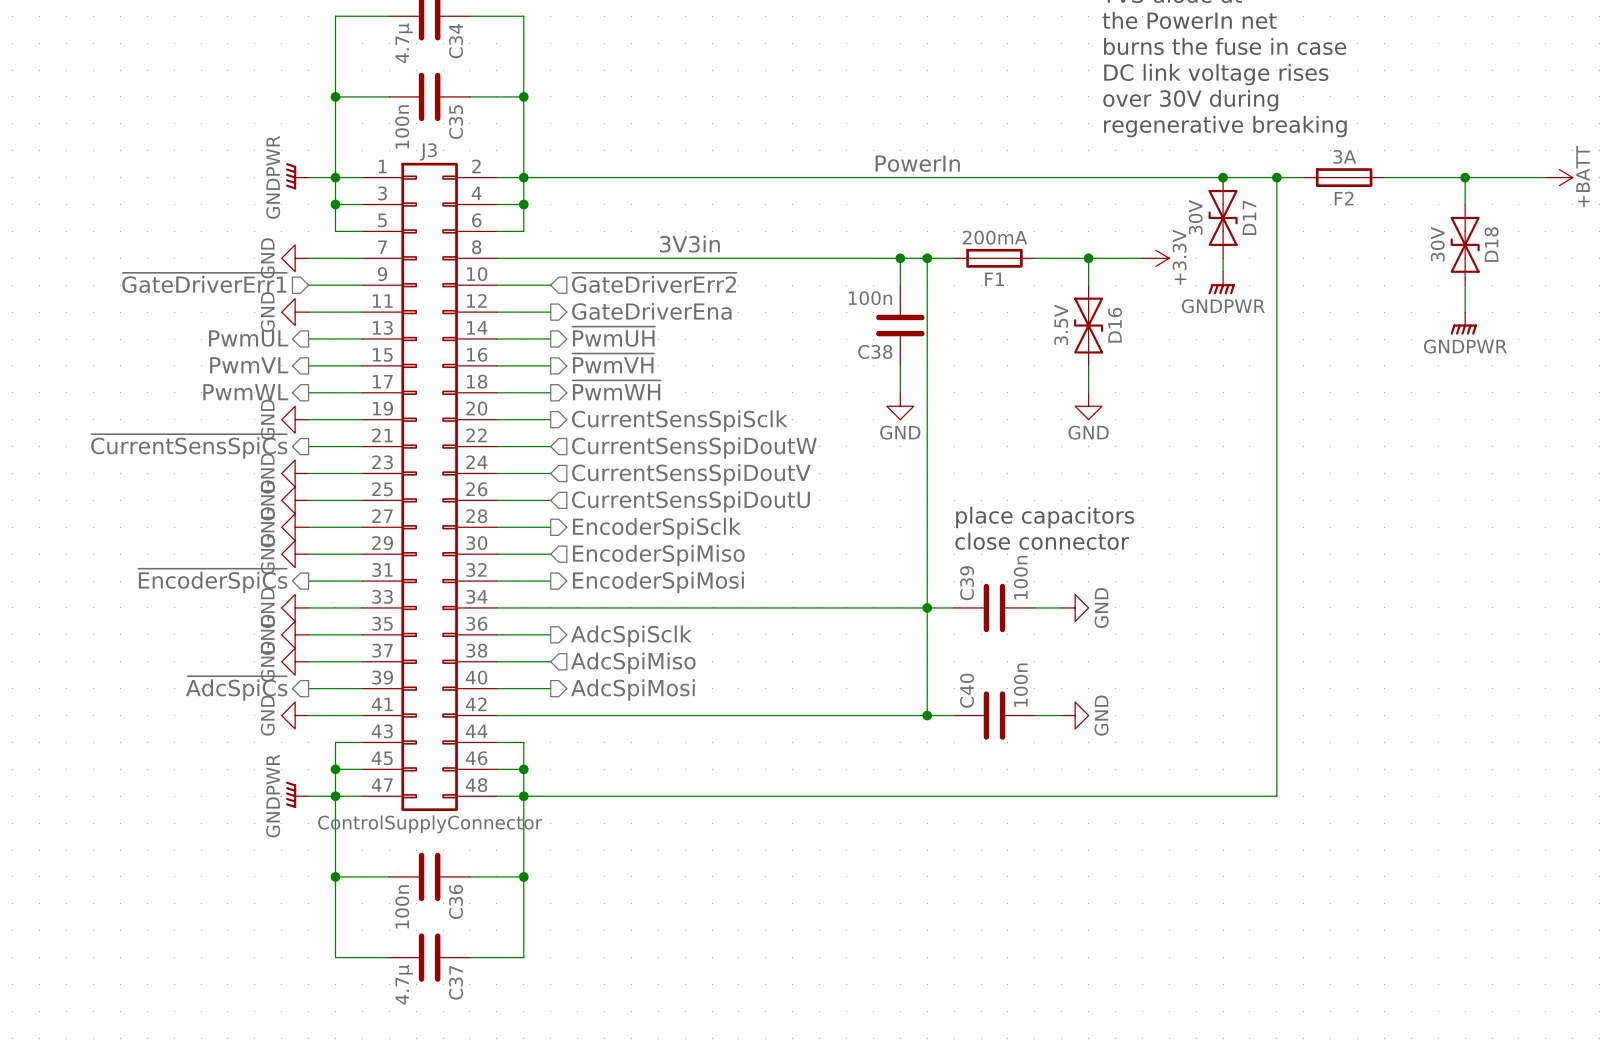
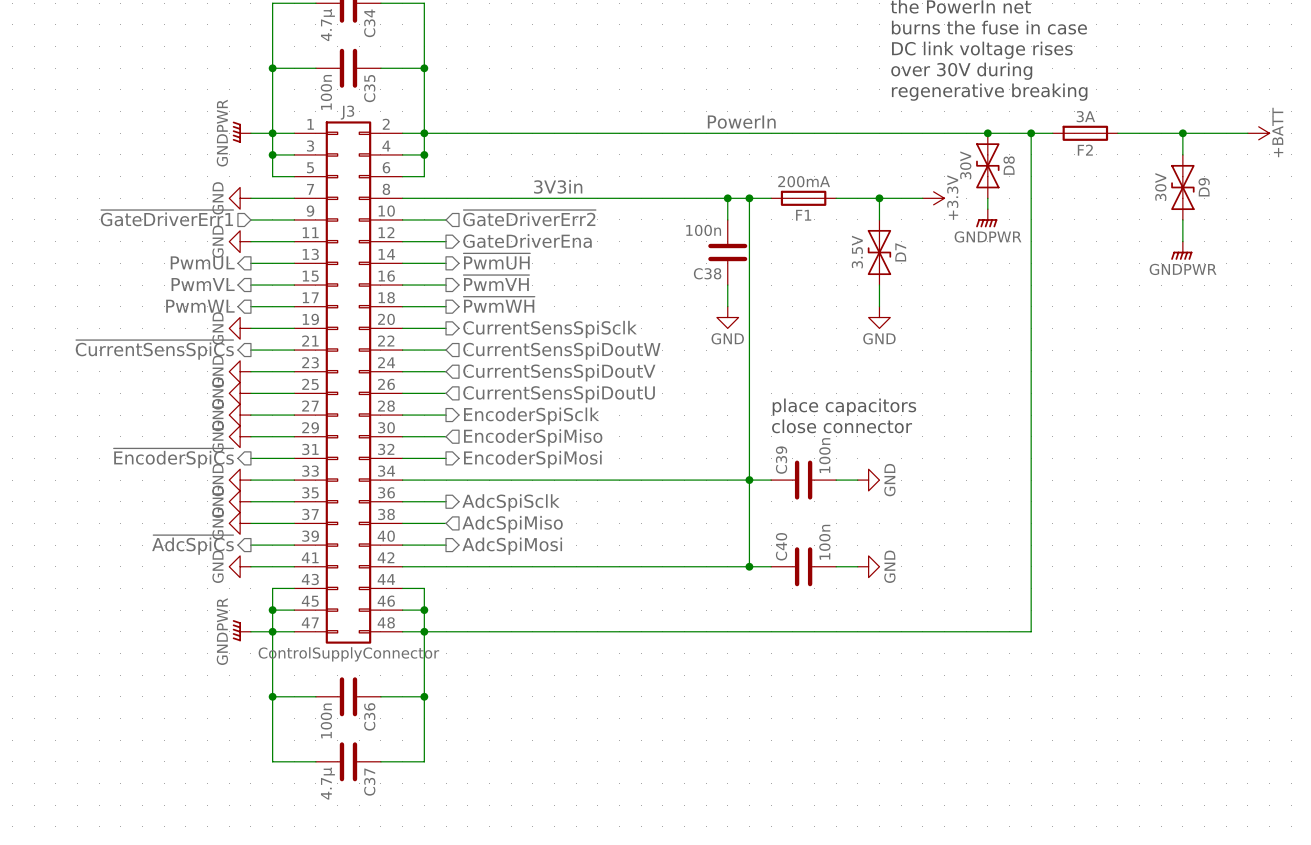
D17 name: D17 (1249, 217) -> D8 (1009, 165)
D18 name: D18 (1491, 244) -> D9 (1204, 187)
D16 name: D16 (1115, 325) -> D7 (900, 252)

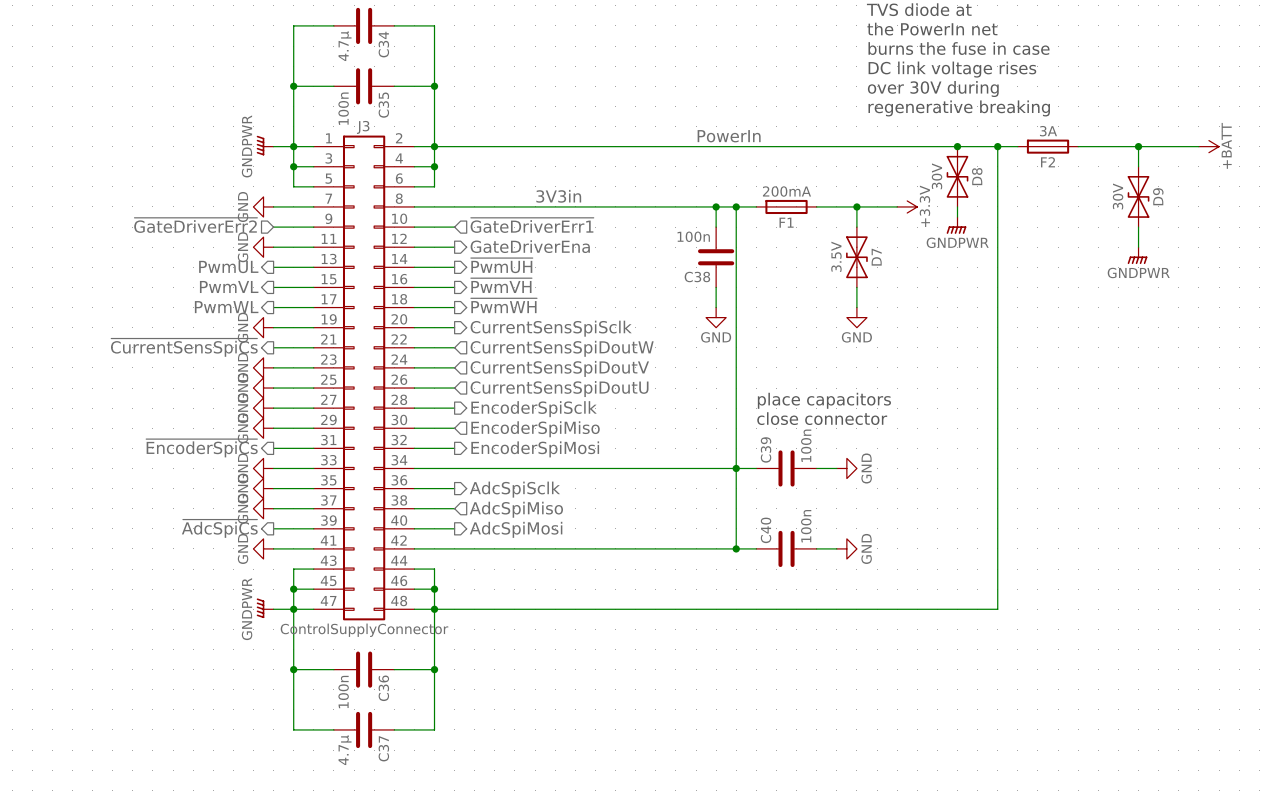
hierarchical label: ~{GateDriverErr1} (167, 218) -> ~{GateDriverErr2} (195, 225)
hierarchical label: ~{GateDriverErr2} (529, 218) -> ~{GateDriverErr1} (532, 225)

